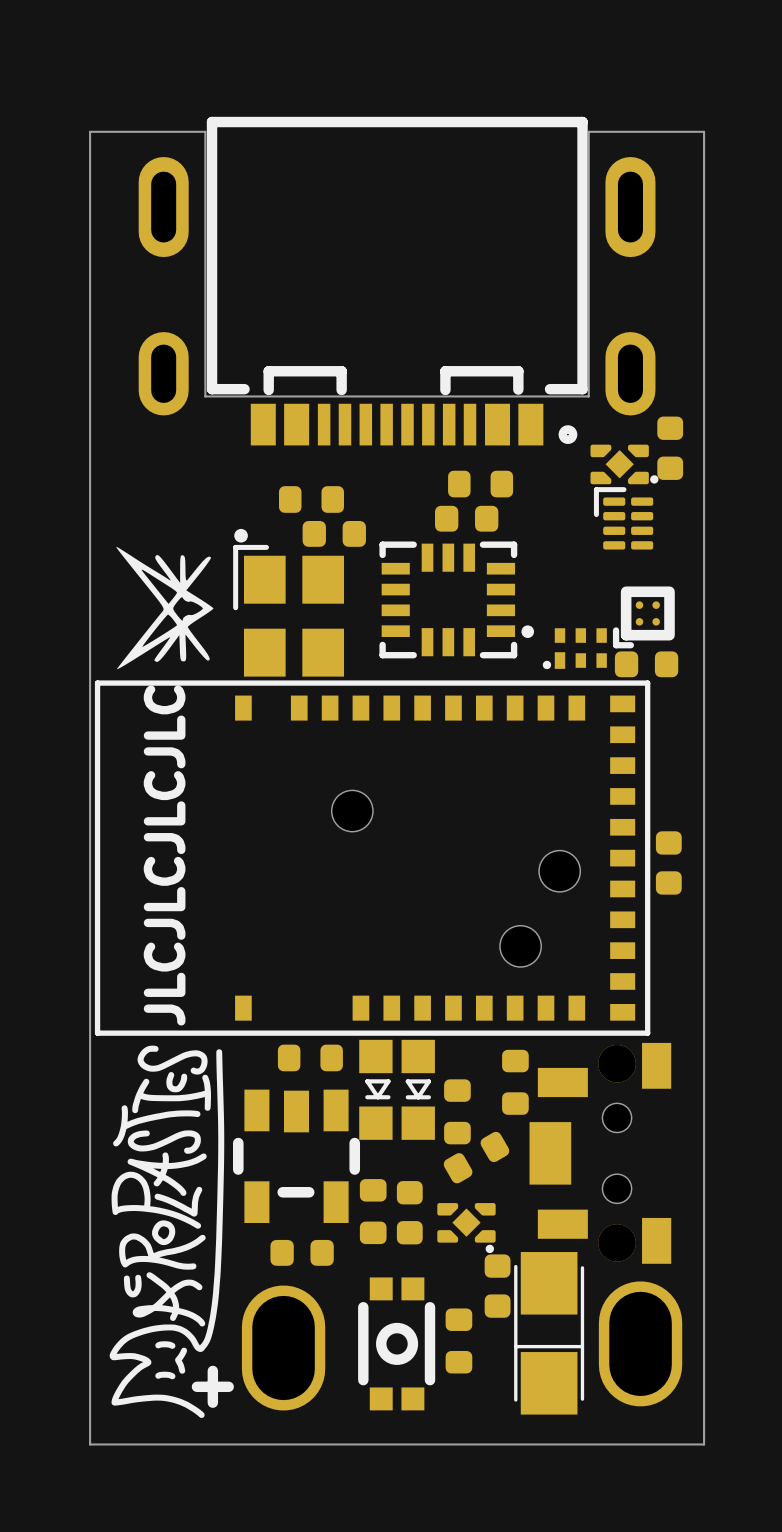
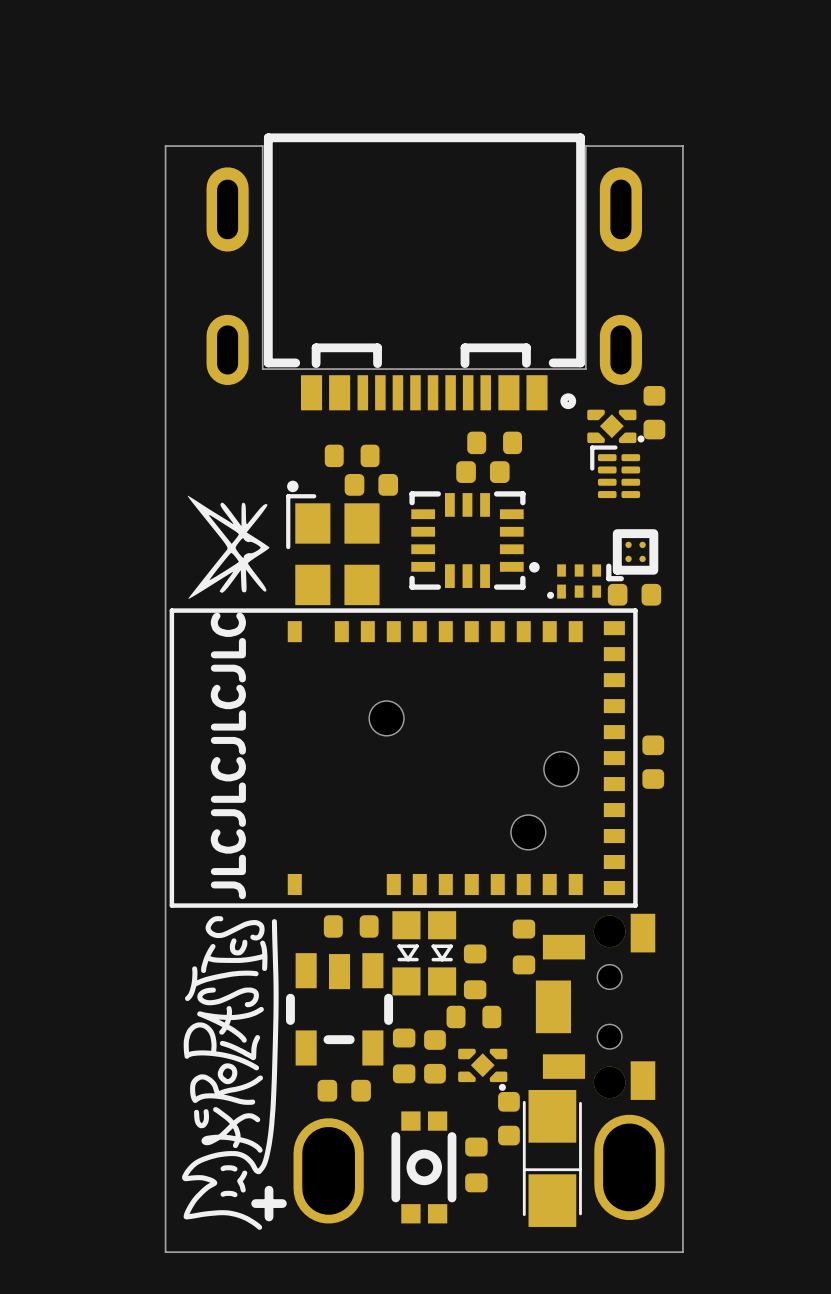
part rotation: 0° (476, 1157) -> 30° clockwise (473, 1016)

